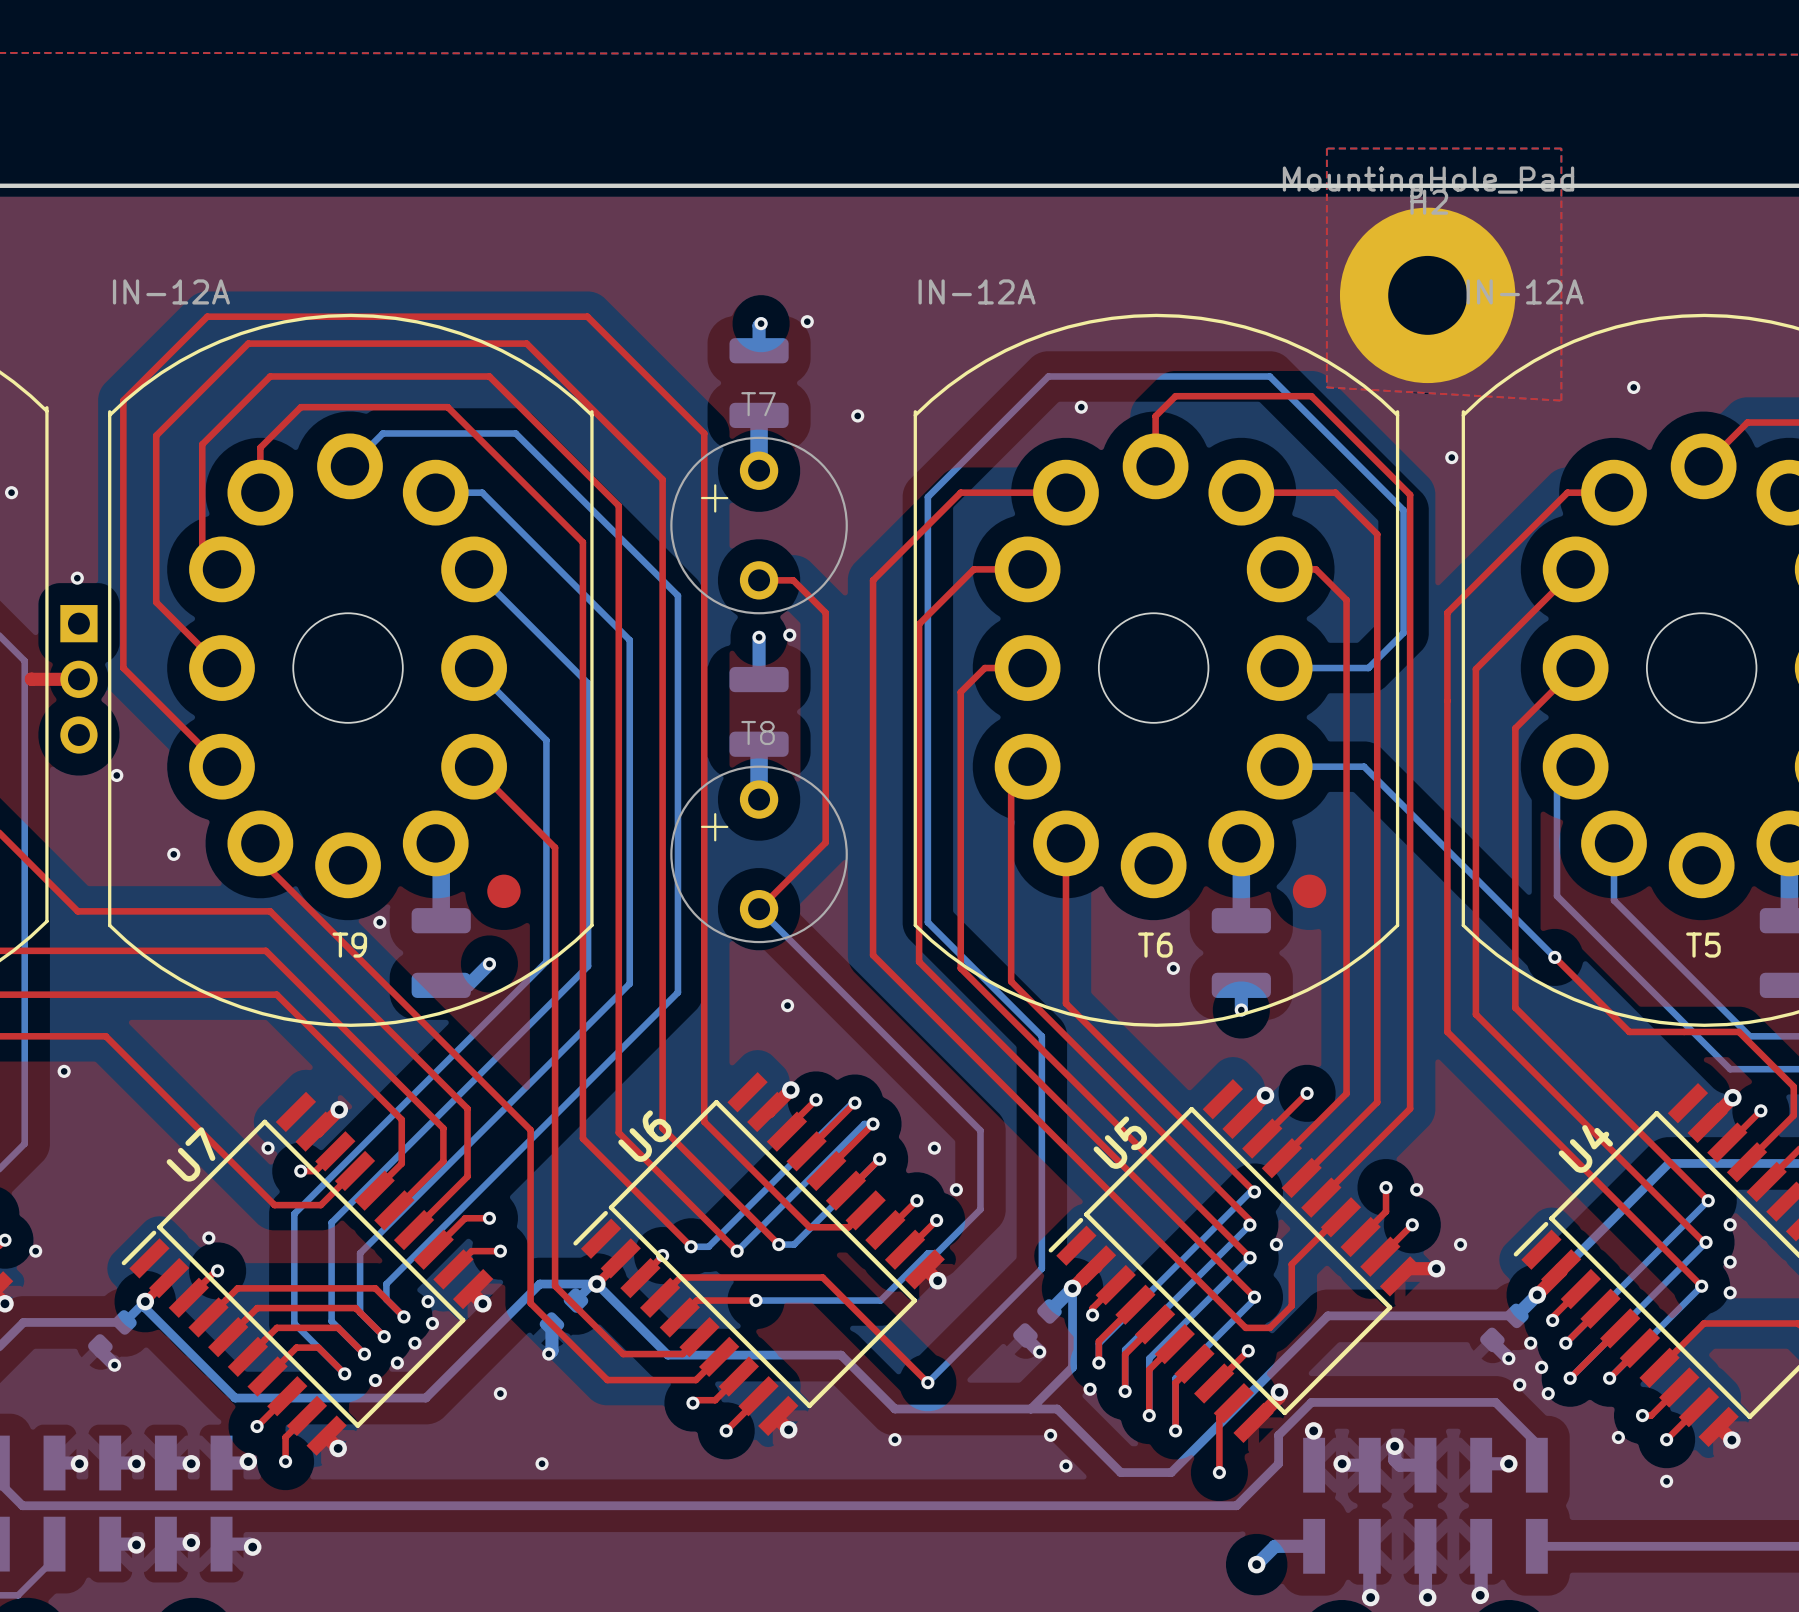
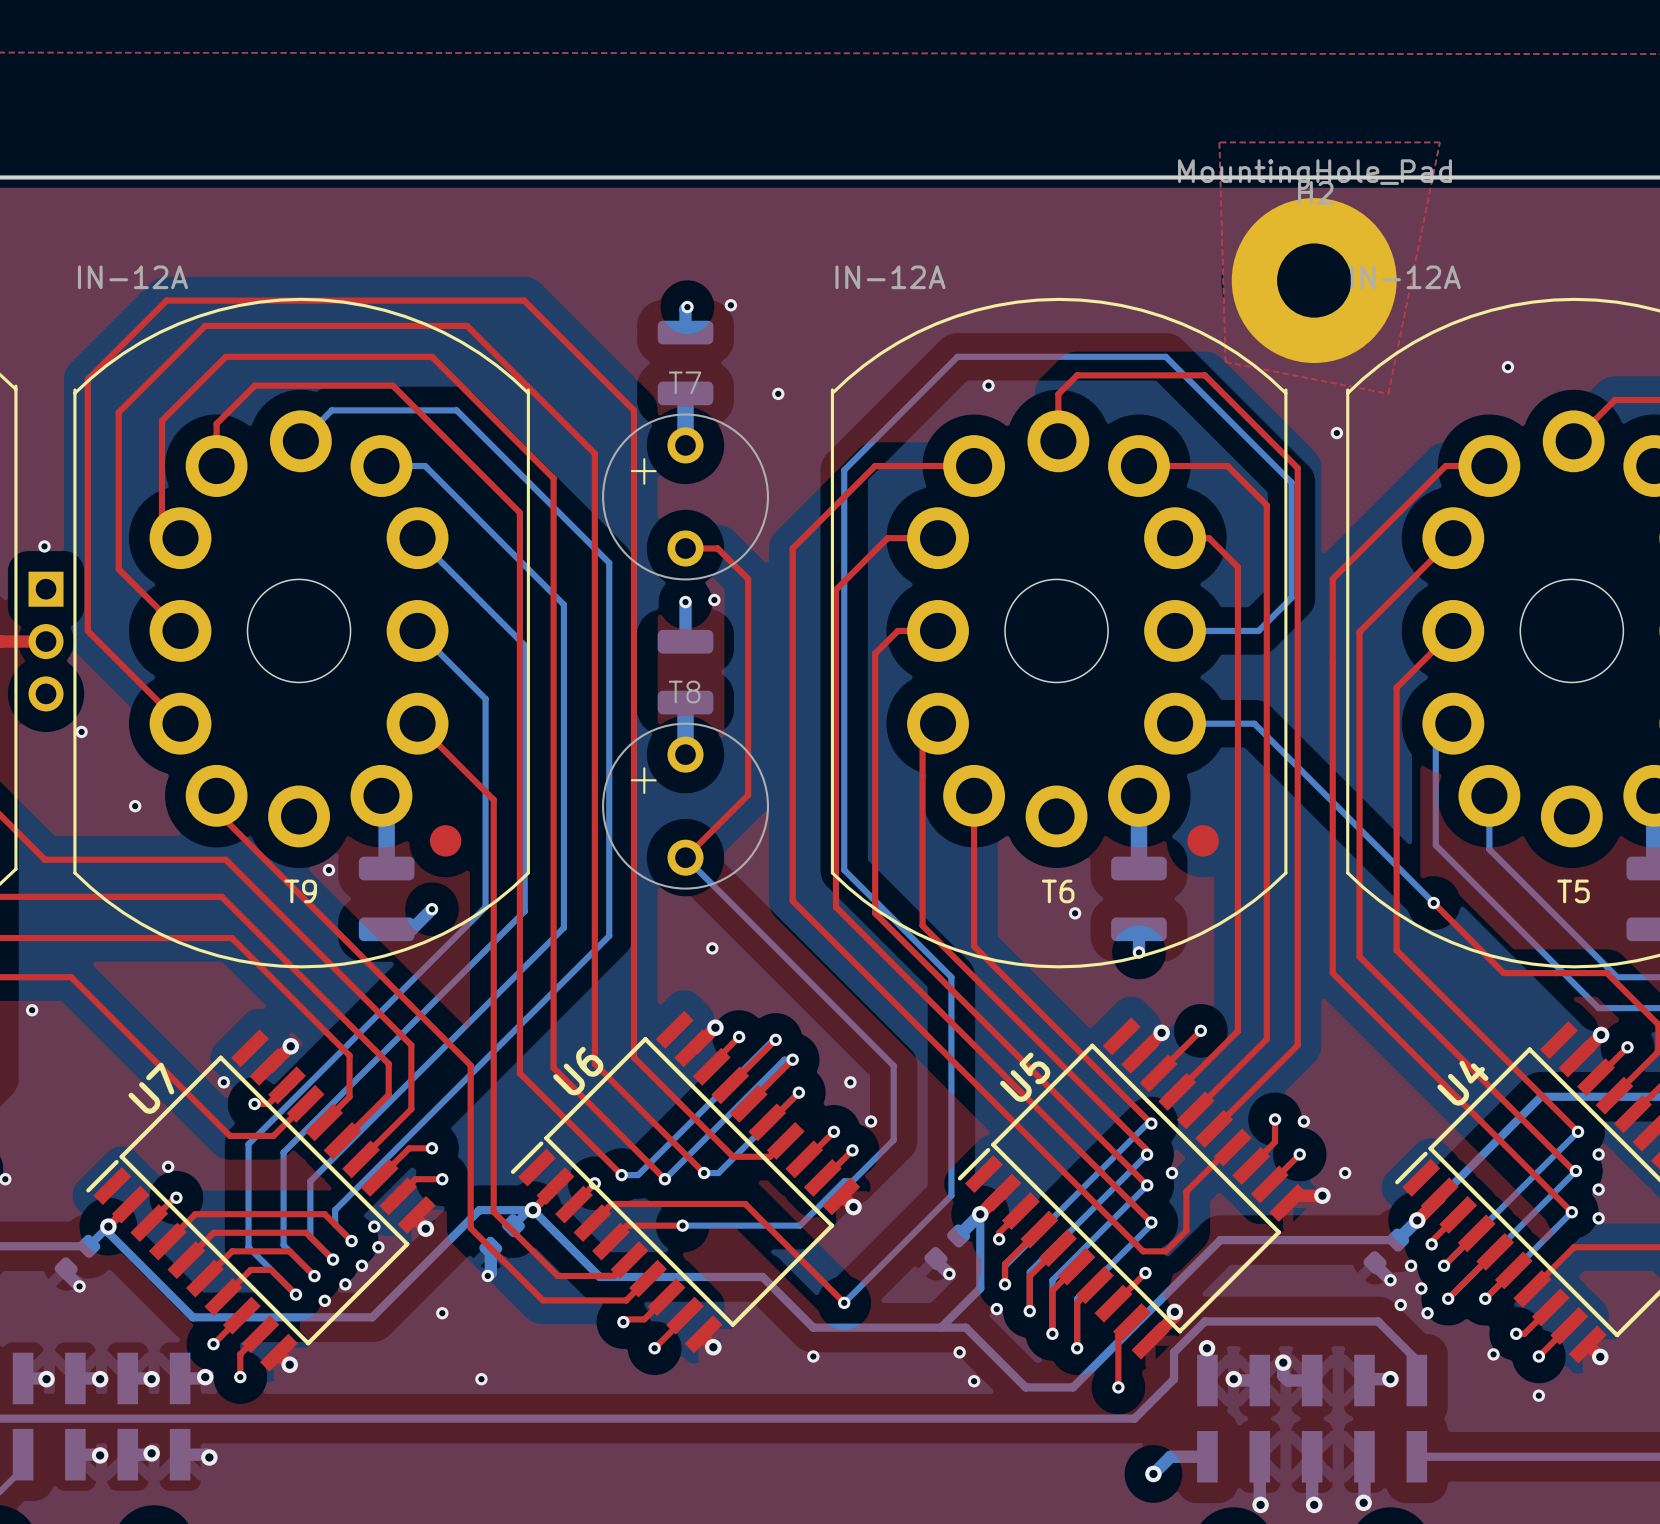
top zone outline: (1326, 148) (1326, 387) (1561, 400) (1561, 148) -> (1219, 142) (1225, 361) (1388, 393) (1439, 142)

